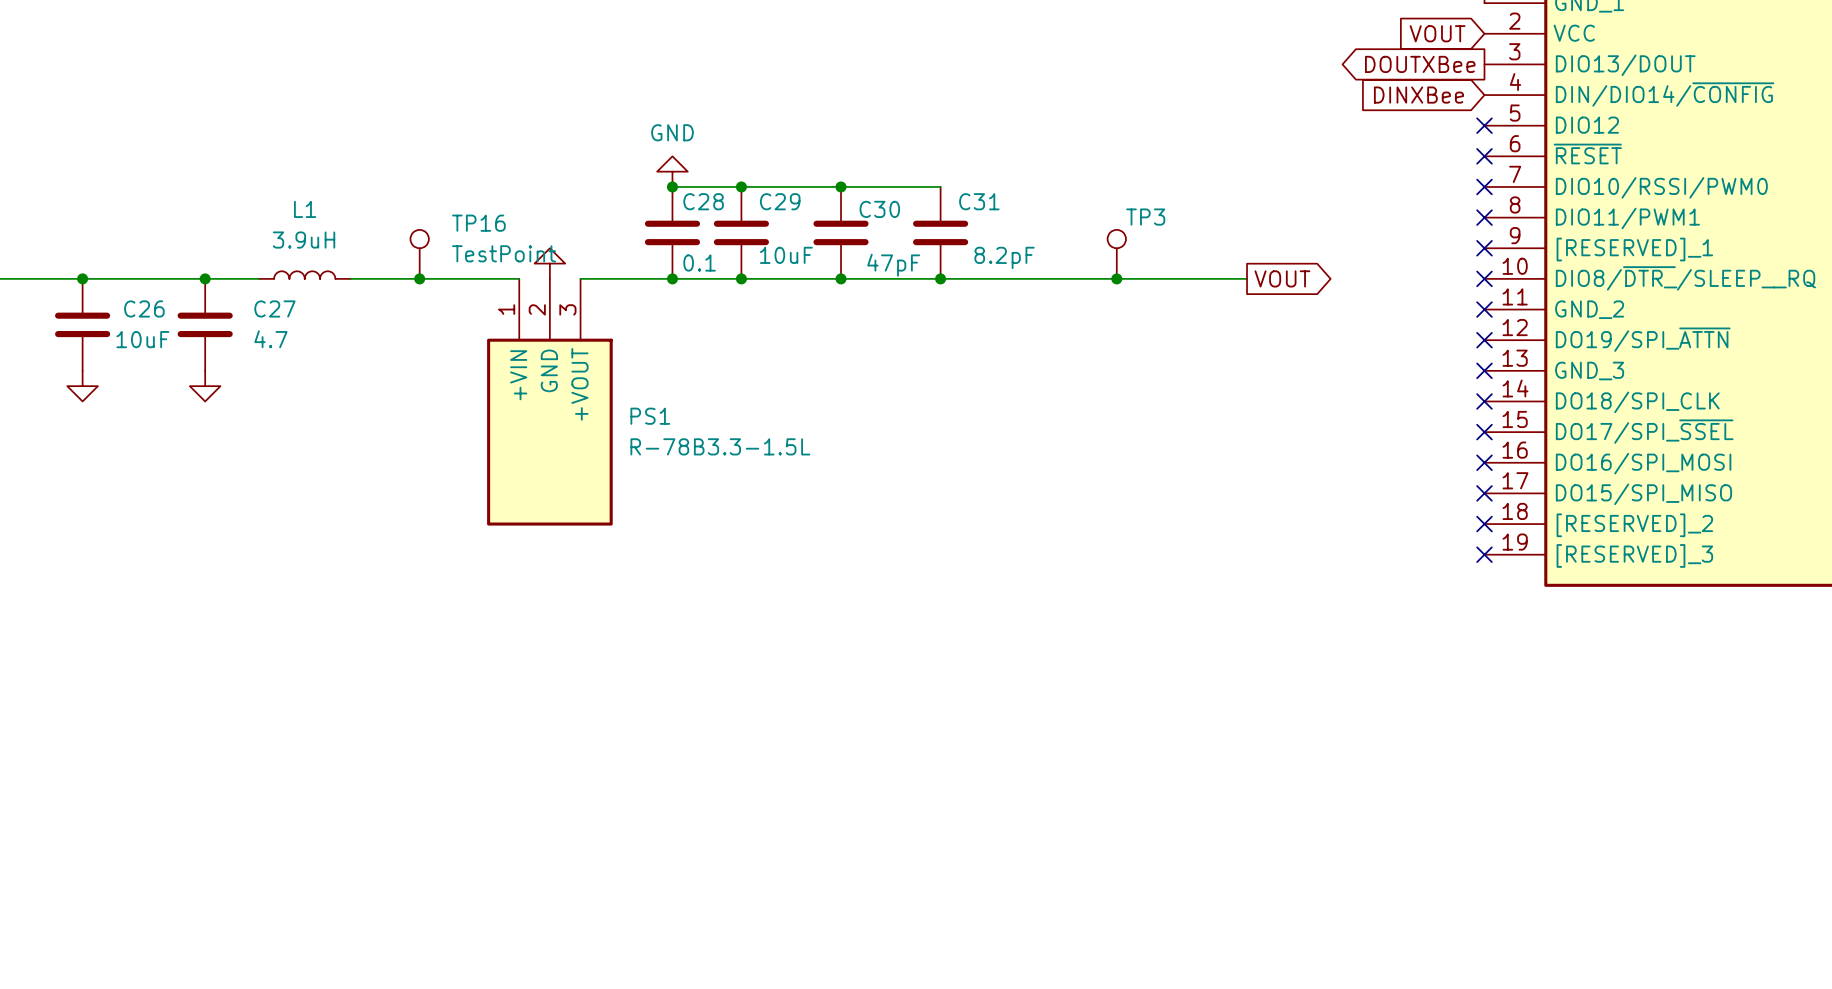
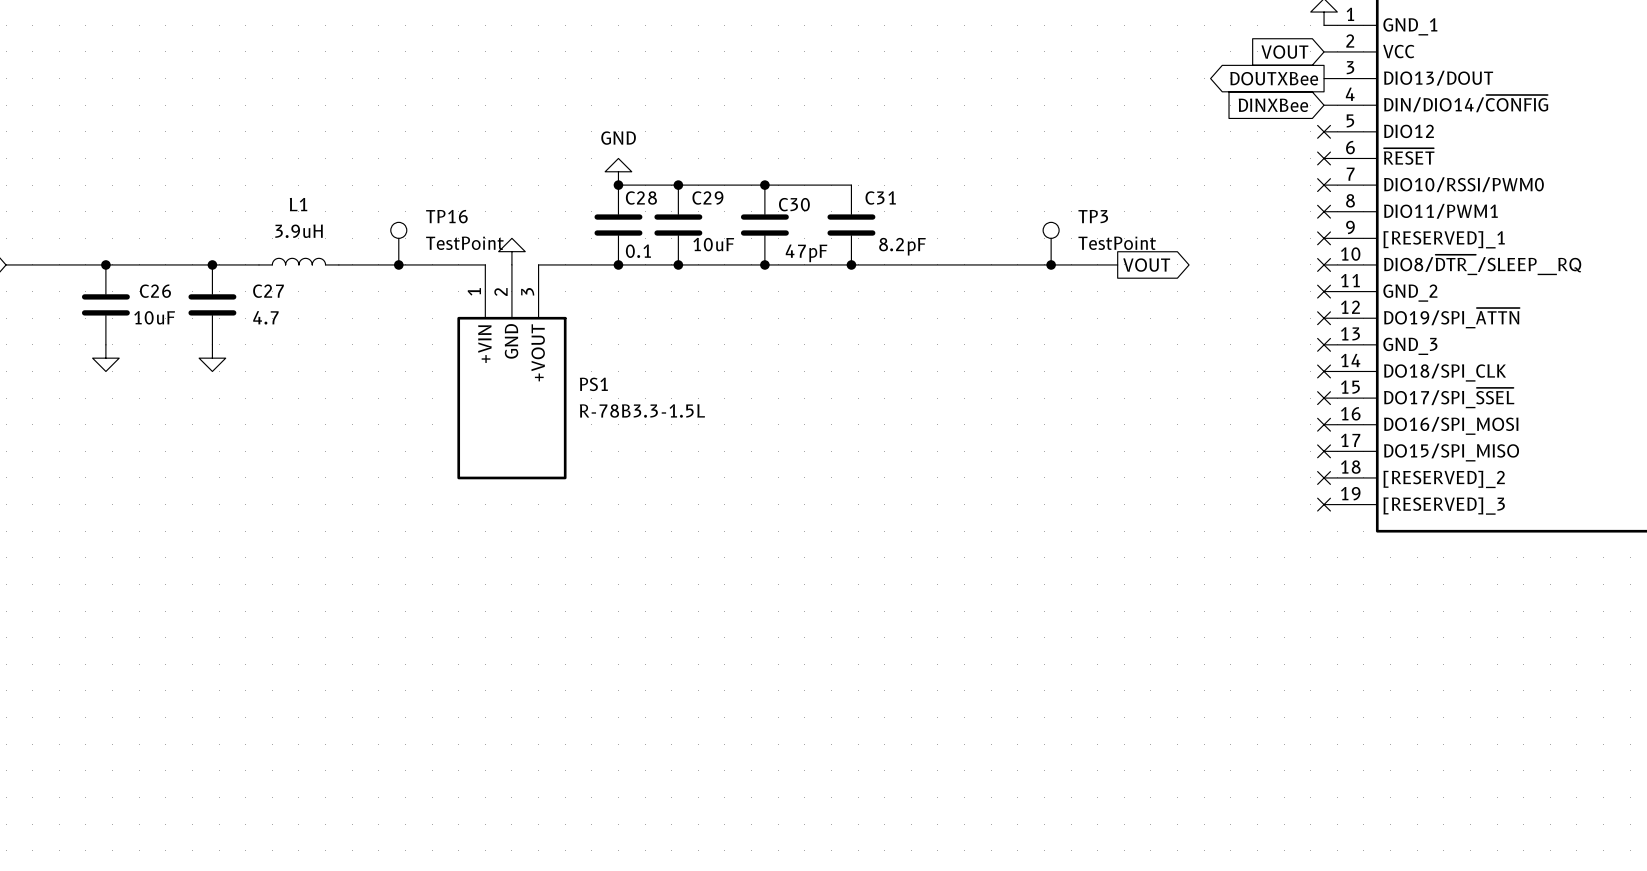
TP3 name position: TP3 (1145, 217) -> TP3 (1093, 216)
TP3 value: none -> TestPoint (1117, 243)
TP3 position: (1116, 254) -> (1051, 243)
junction position: (1116, 278) -> (1051, 264)

